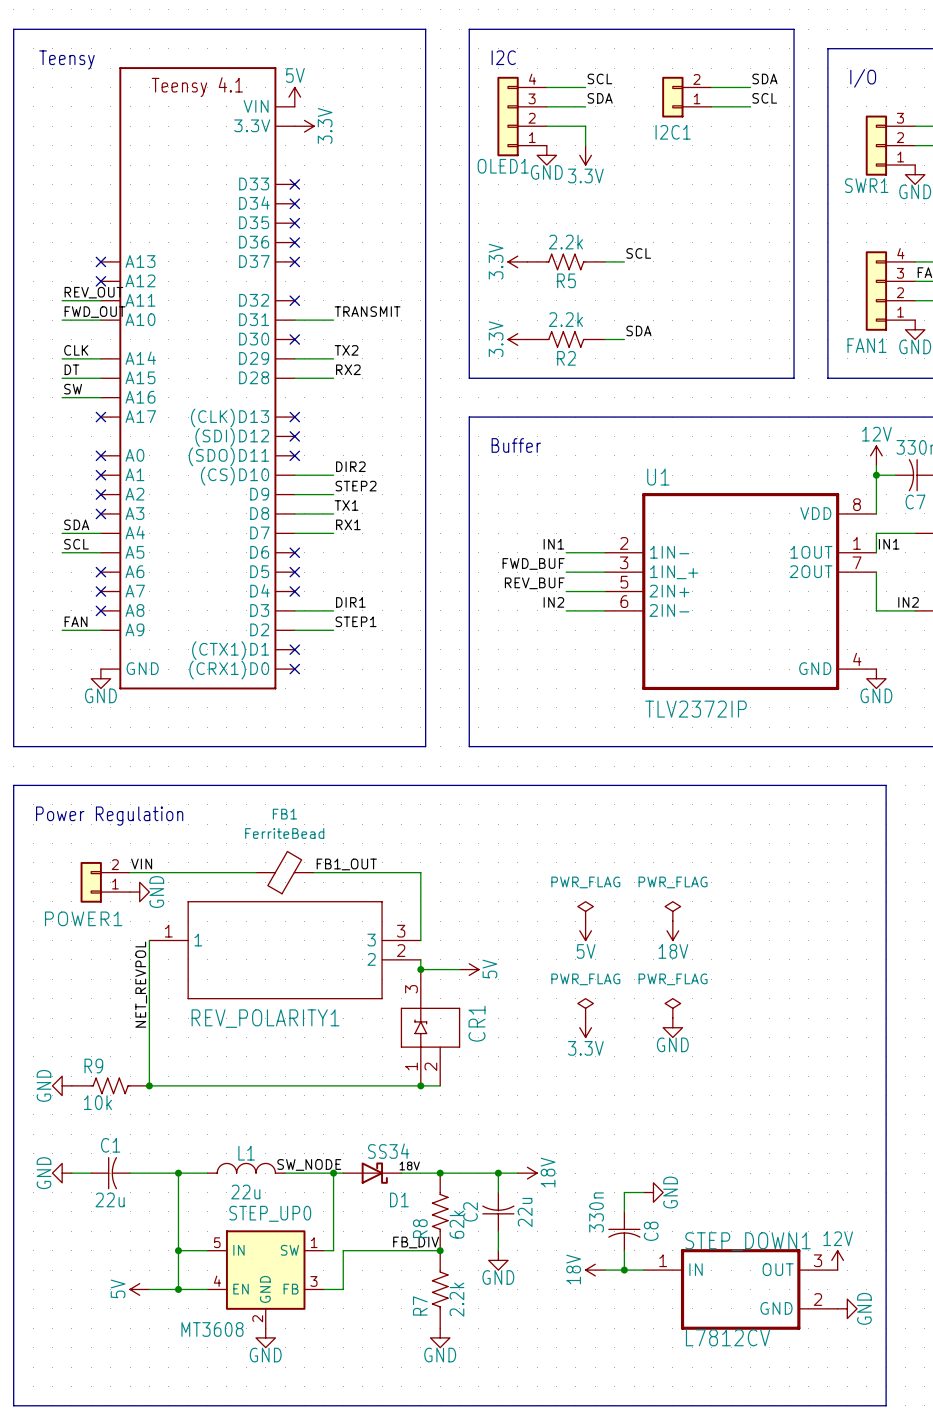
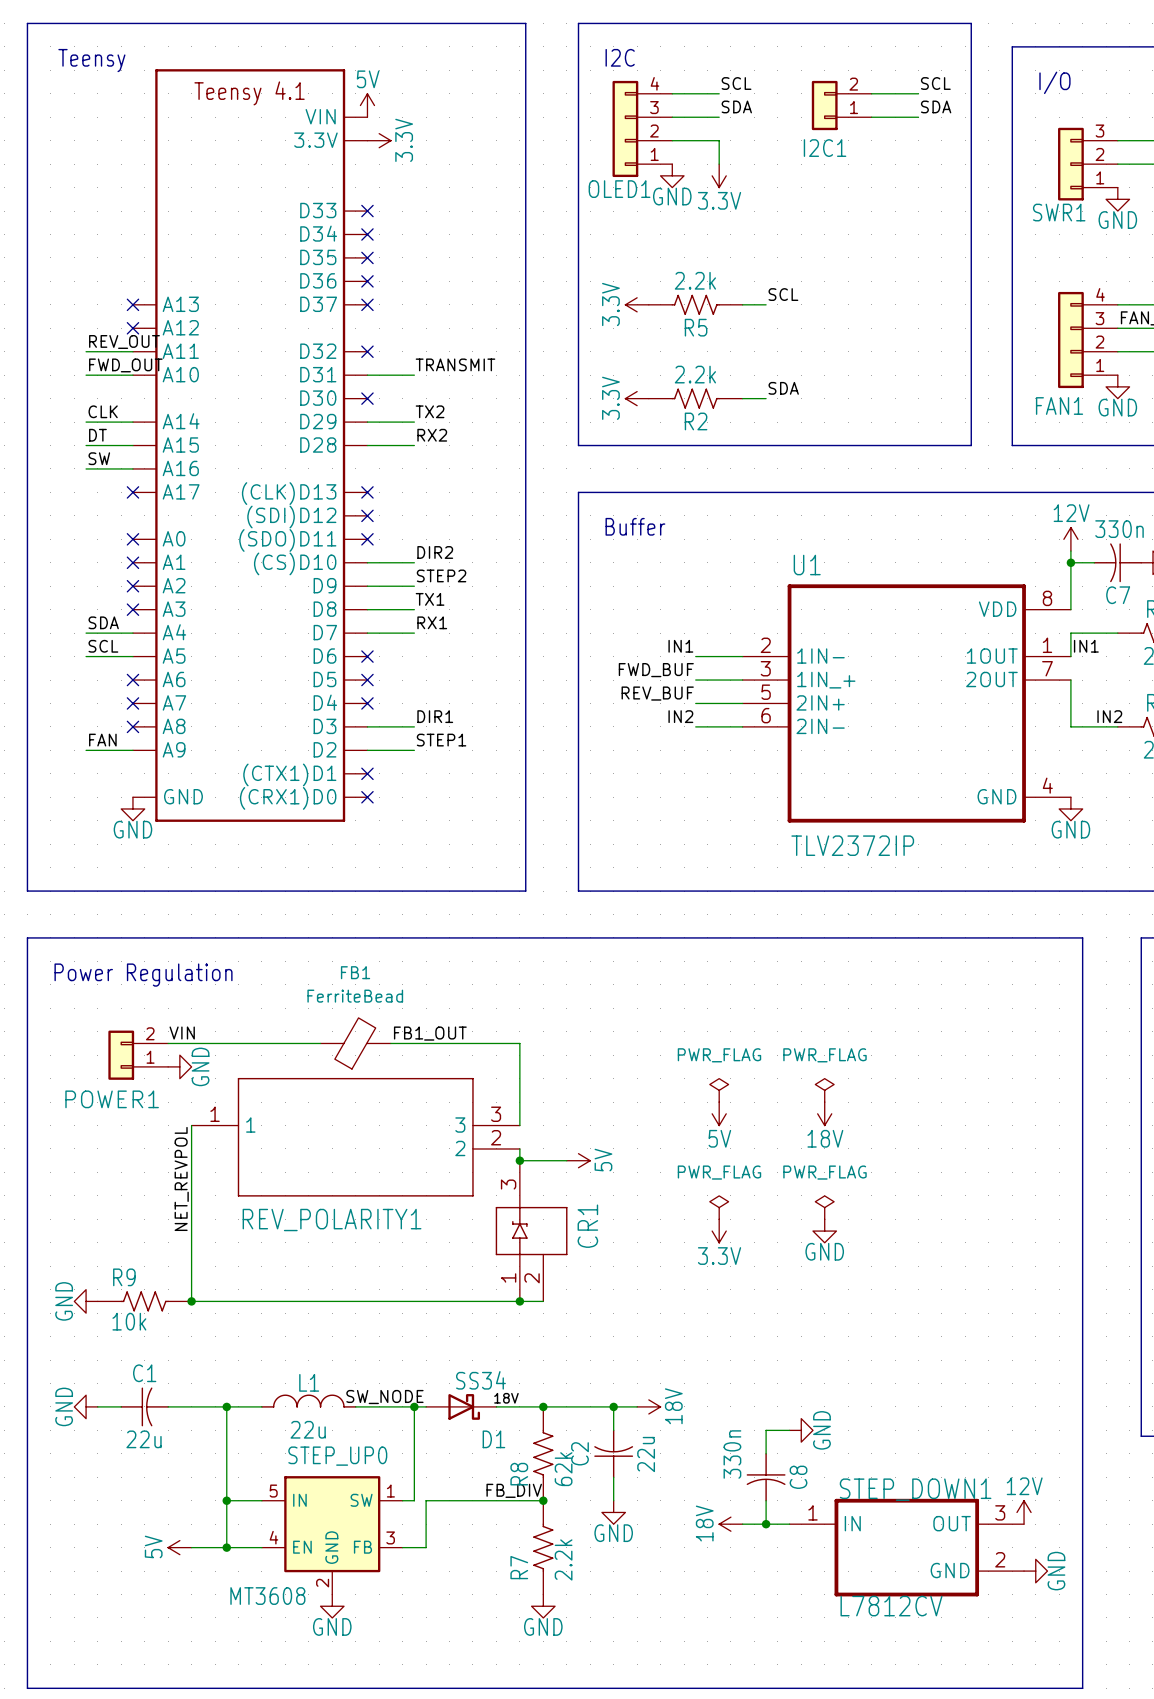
label: SDA (764, 78) -> SCL (935, 83)
label: SCL (764, 98) -> SDA (936, 106)

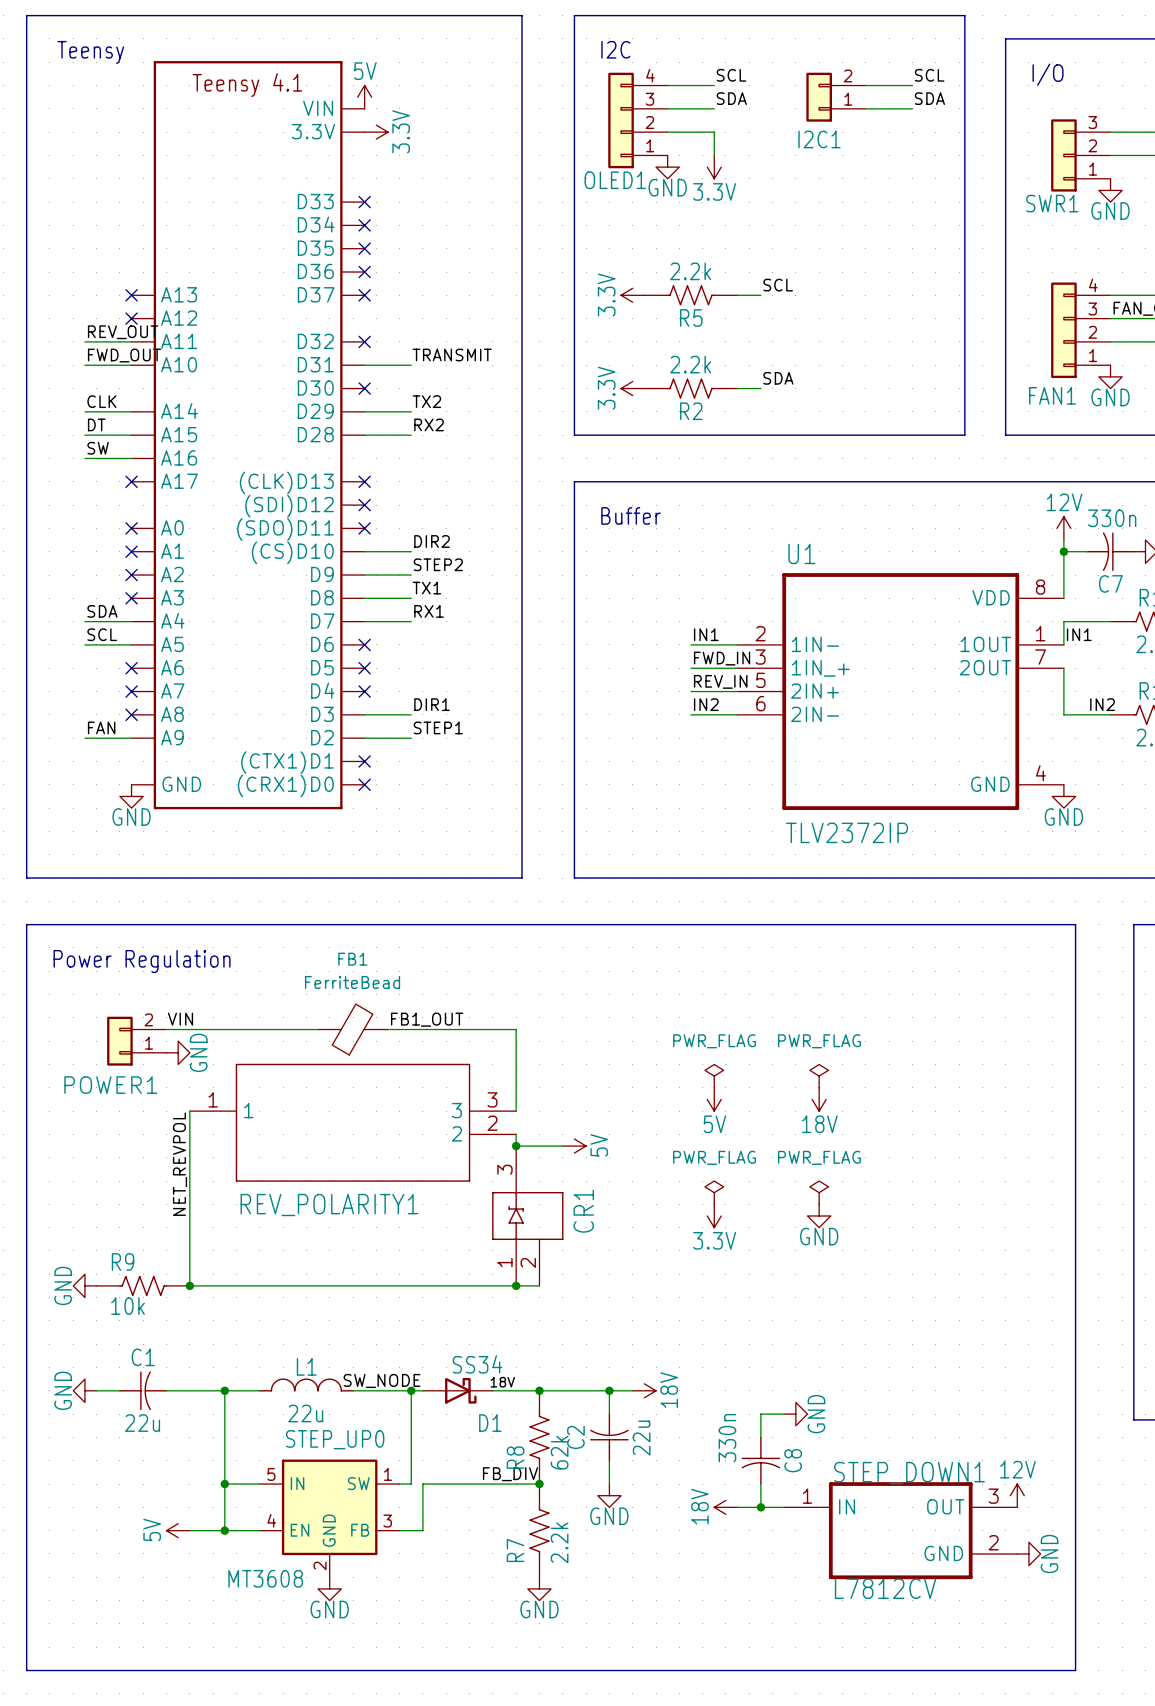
label position: IN1 (680, 646) -> IN1 (706, 634)
label: FWD_BUF (656, 670) -> FWD_IN (722, 658)
label: REV_BUF (657, 693) -> REV_IN (720, 681)
label position: IN2 (680, 716) -> IN2 (706, 704)

